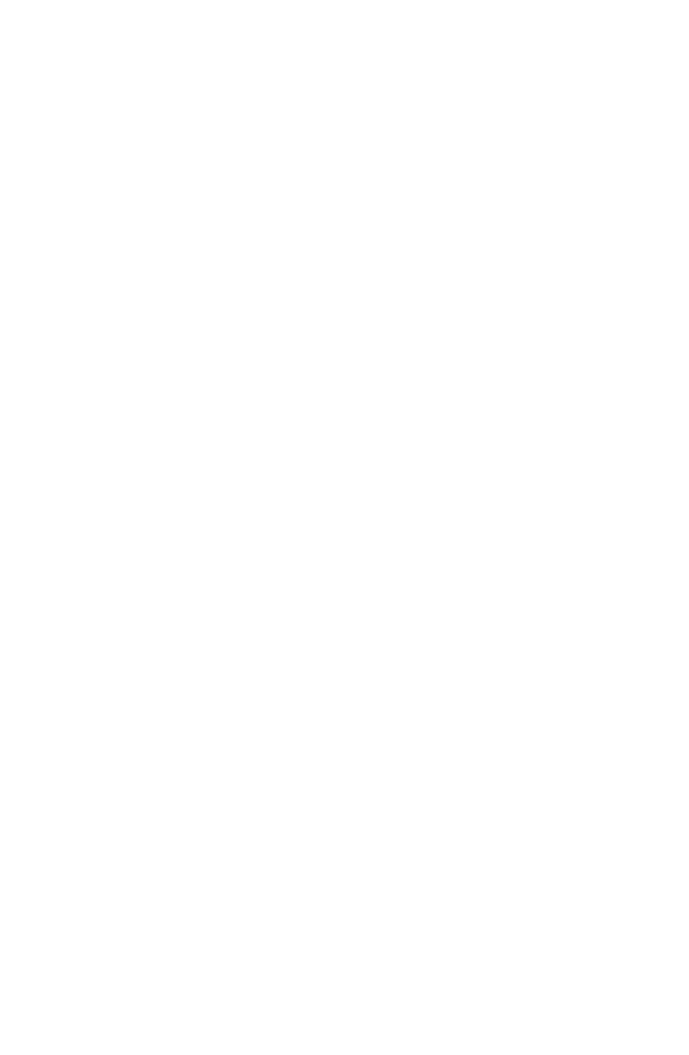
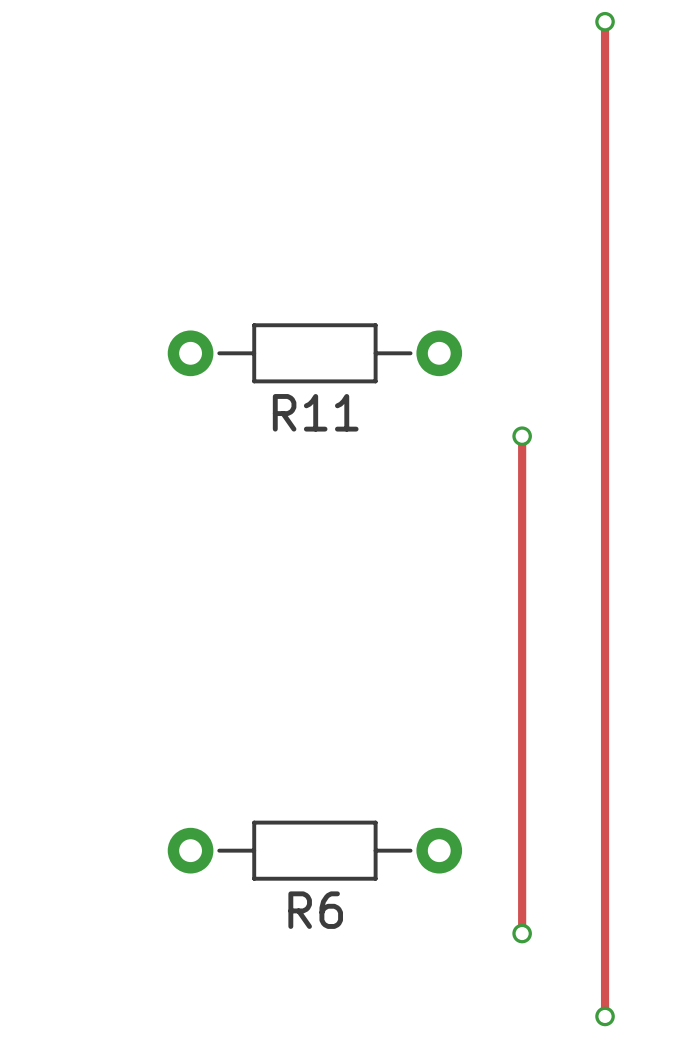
track: none -> (605, 21) (605, 1016)
via: none -> (605, 21)
R11: none -> (314, 353)
track: none -> (522, 436) (522, 933)
via: none -> (522, 436)
R6: none -> (314, 850)
via: none -> (522, 933)
via: none -> (605, 1016)

